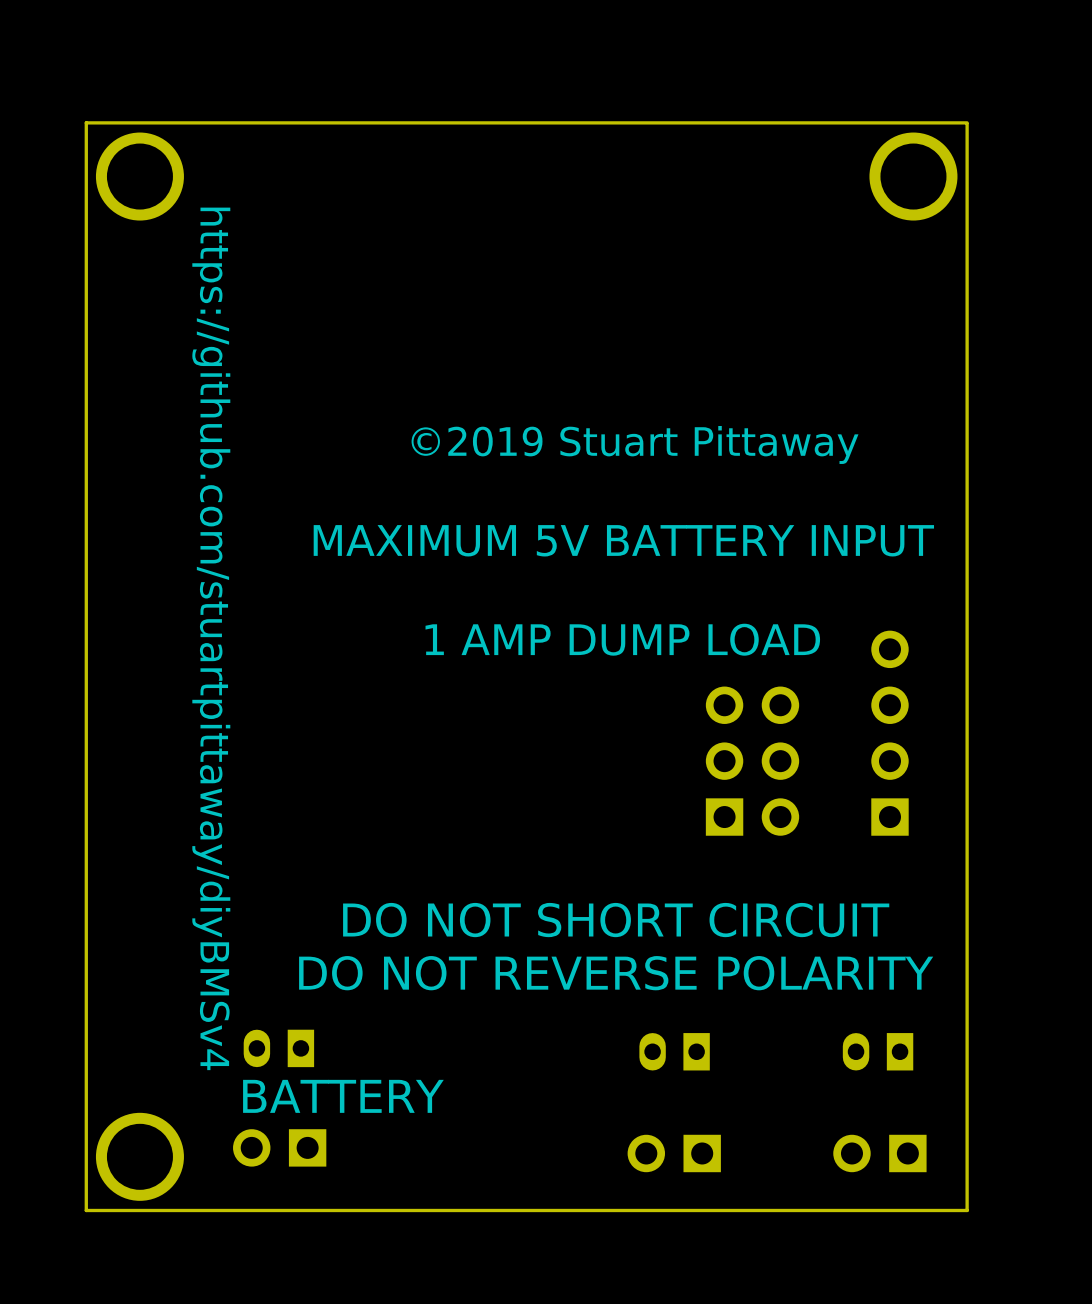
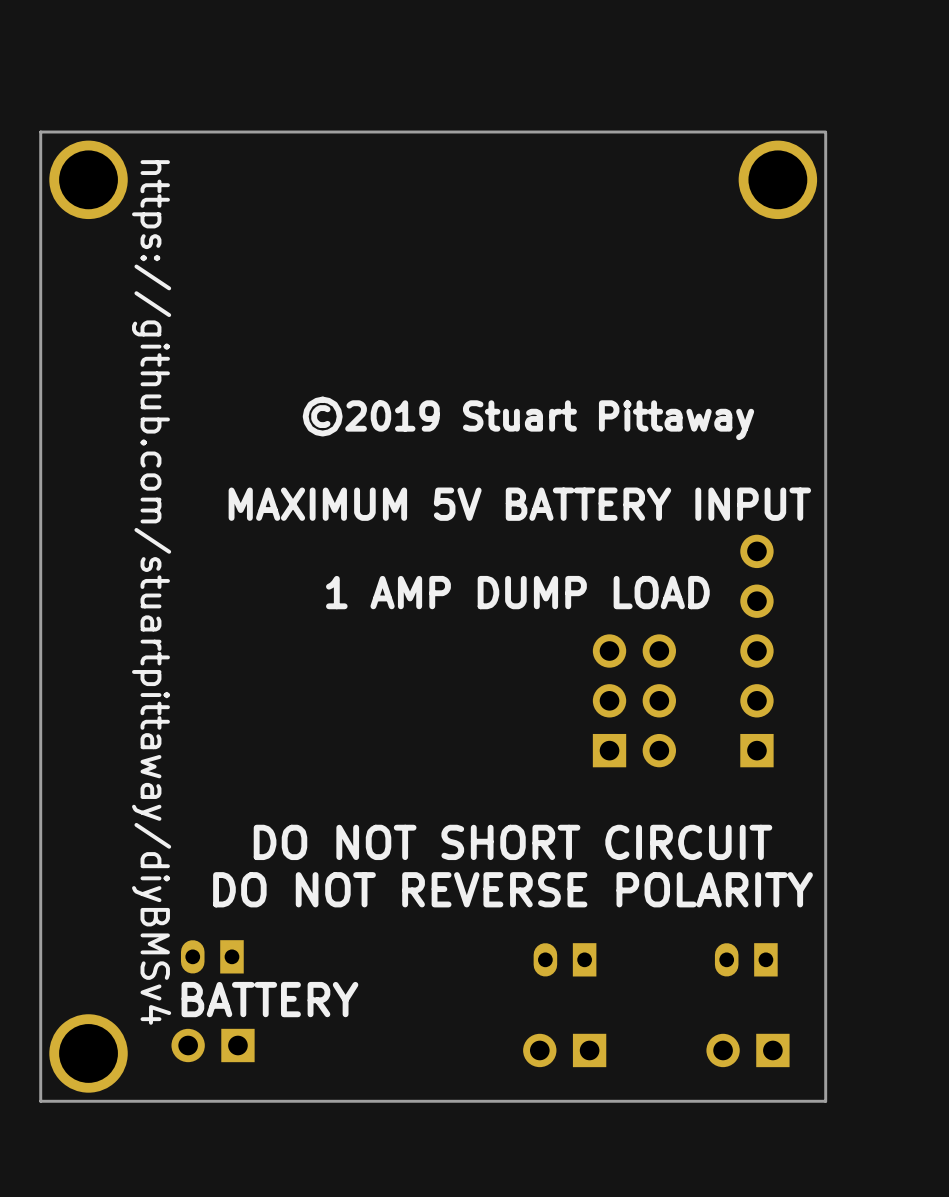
part: none -> (756, 651)

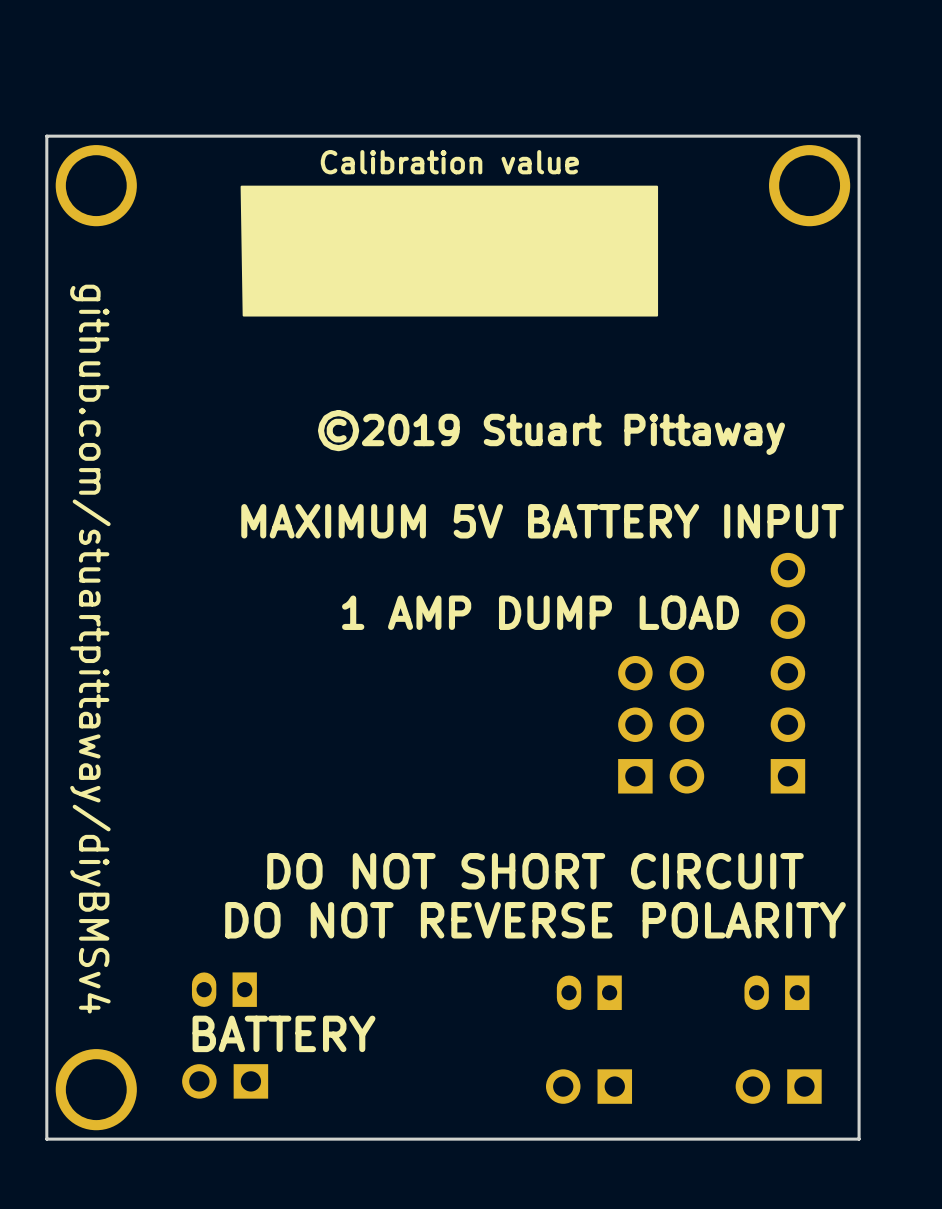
text: none -> Calibration value (449, 162)
drawing: none -> [240, 185, 659, 317]
text: https://github.com/stuartpittaway/diyBMSv4 (151, 592) -> none
text: none -> github.com/stuartpittaway/diyBMSv4 (90, 649)

